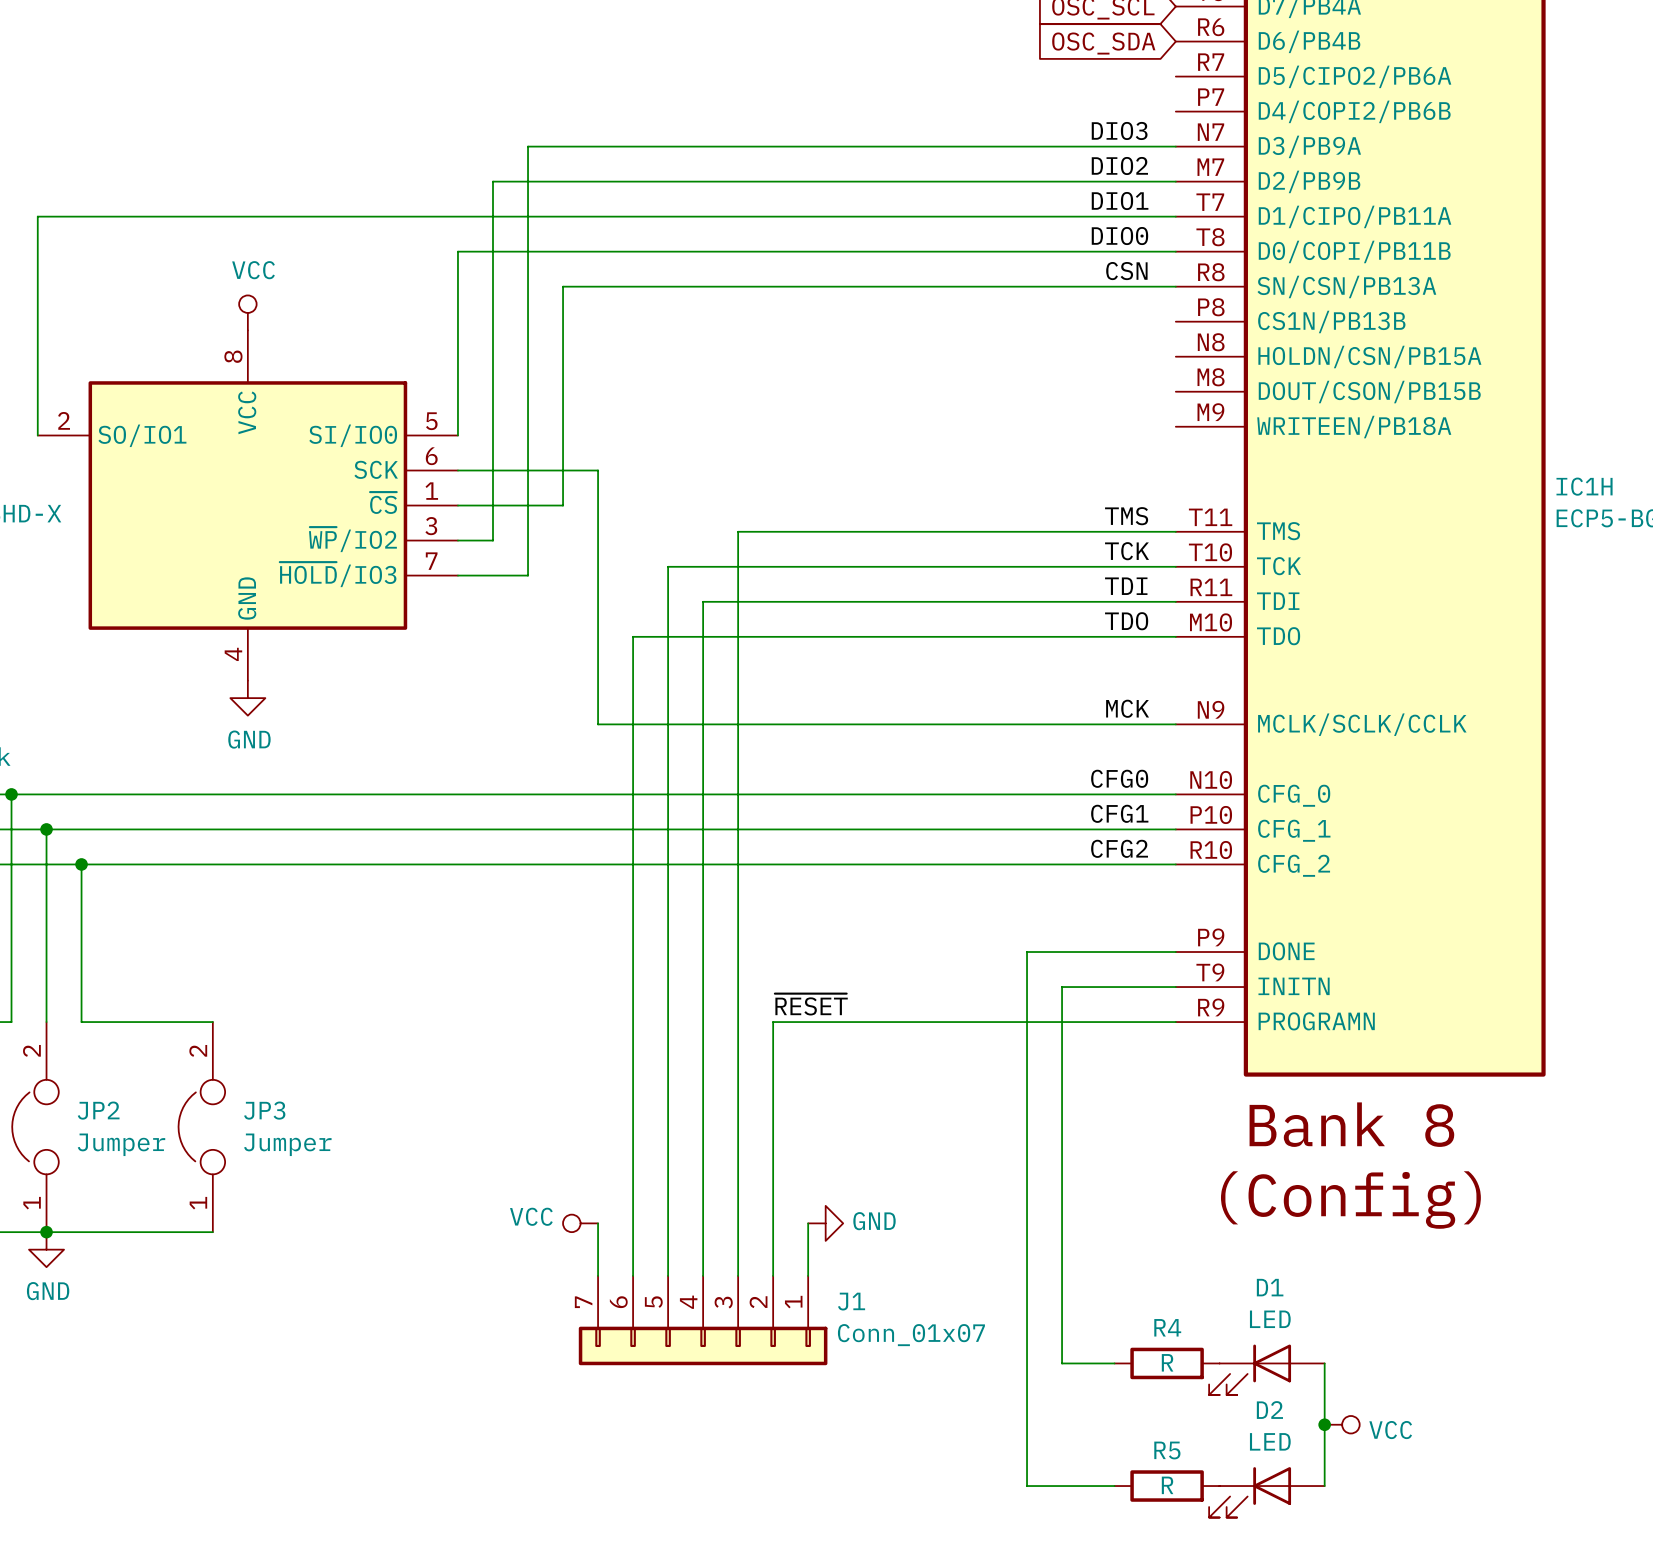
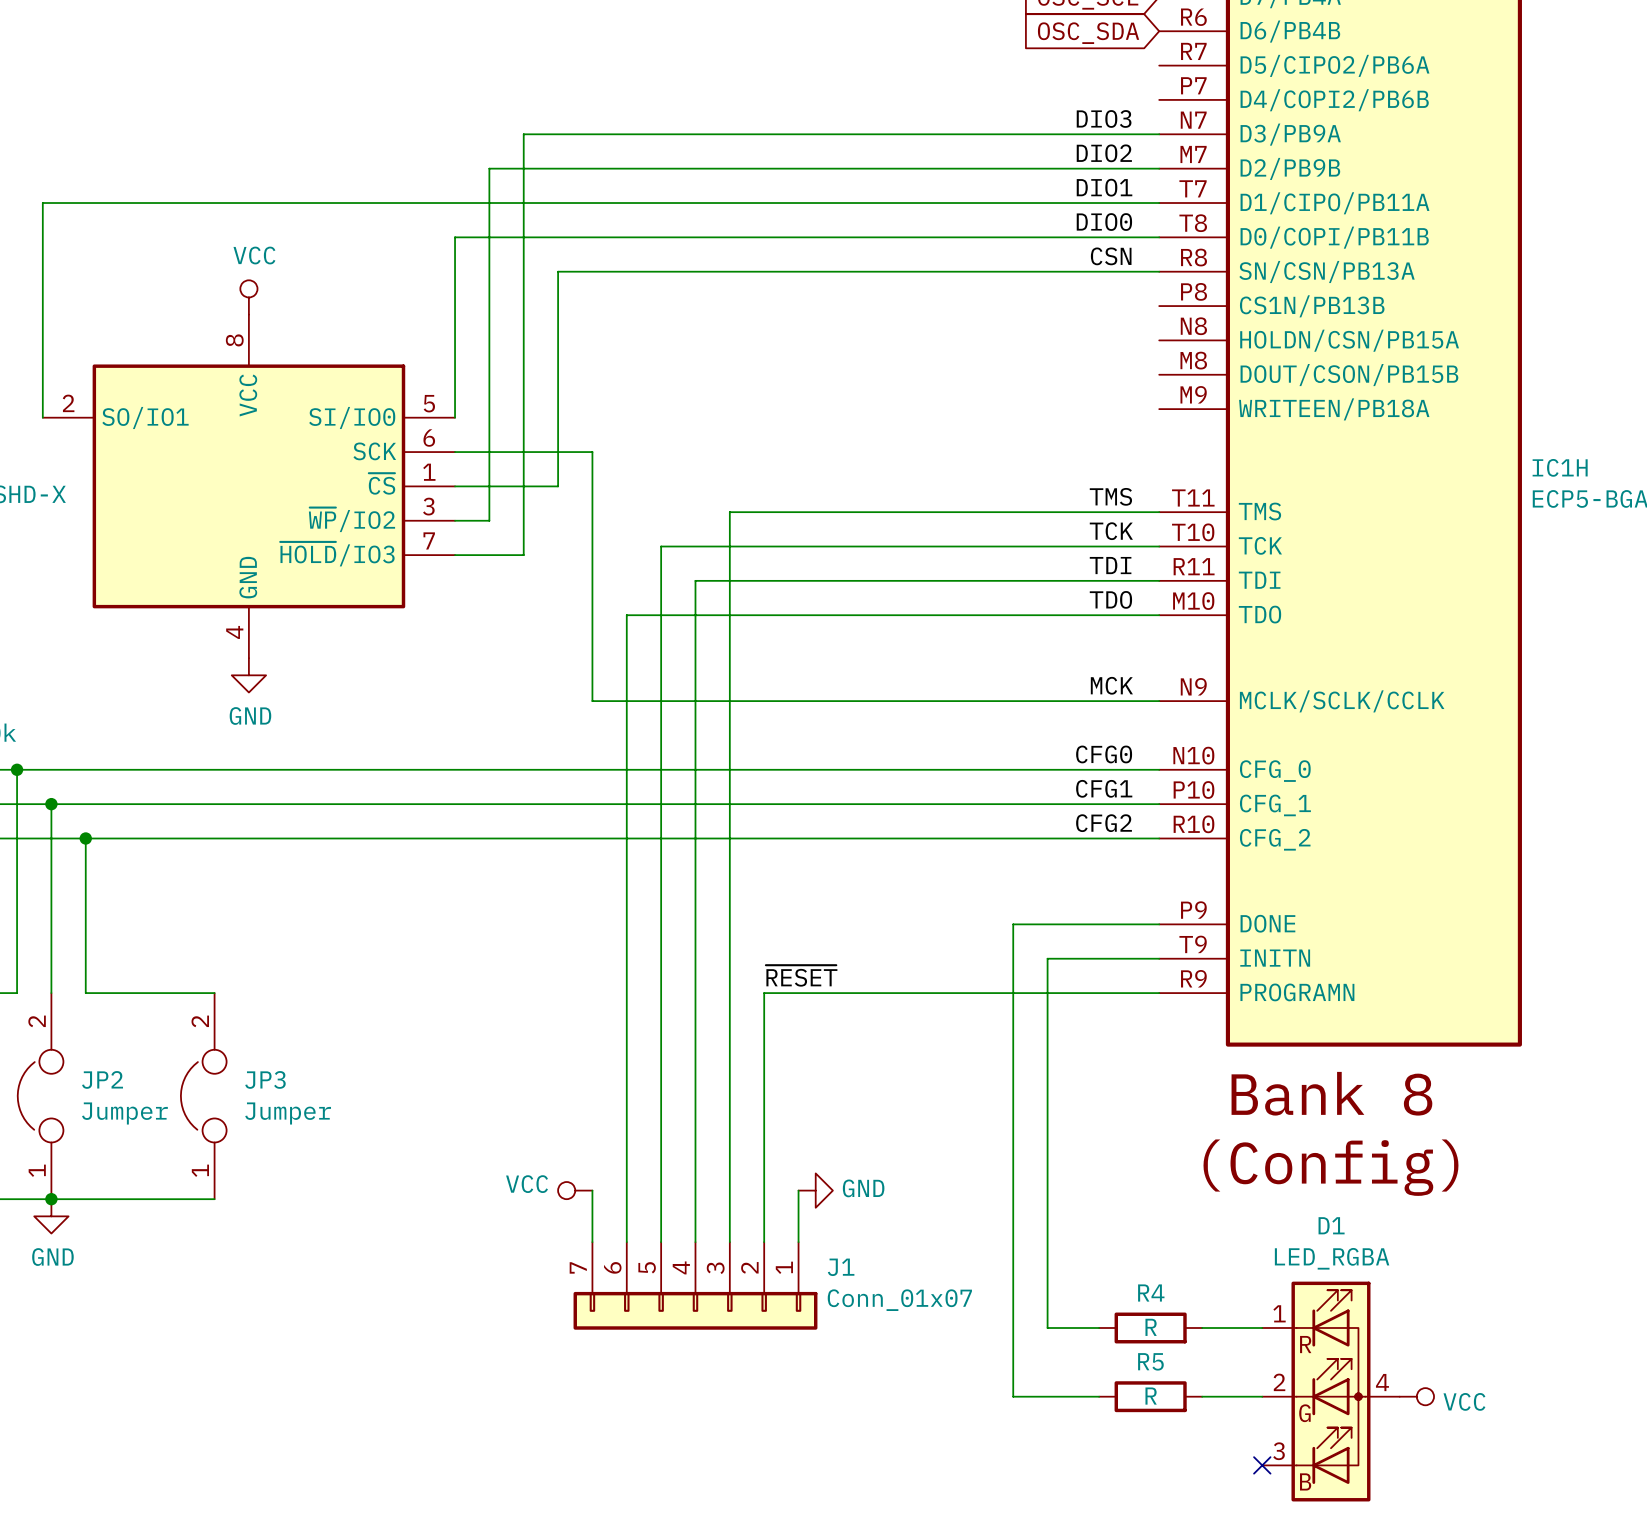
D1 name position: D1 (1270, 1287) -> D1 (1331, 1225)
D1 value: LED (1270, 1319) -> LED_RGBA (1332, 1258)
D1 symbol: [1209, 1344, 1325, 1395] -> [1262, 1281, 1400, 1502]
junction: (1324, 1424) -> none
power symbol position: VCC (1342, 1424) -> VCC (1416, 1396)
wire: (1027, 1433) (1027, 1486) (1114, 1486) -> (1013, 1396) (1099, 1396)
wire: none -> (1202, 1396) (1262, 1396)
R5 position: (1167, 1486) -> (1150, 1396)
D2: LED (1266, 1492) -> none
no-connect mark: none -> (1262, 1465)

